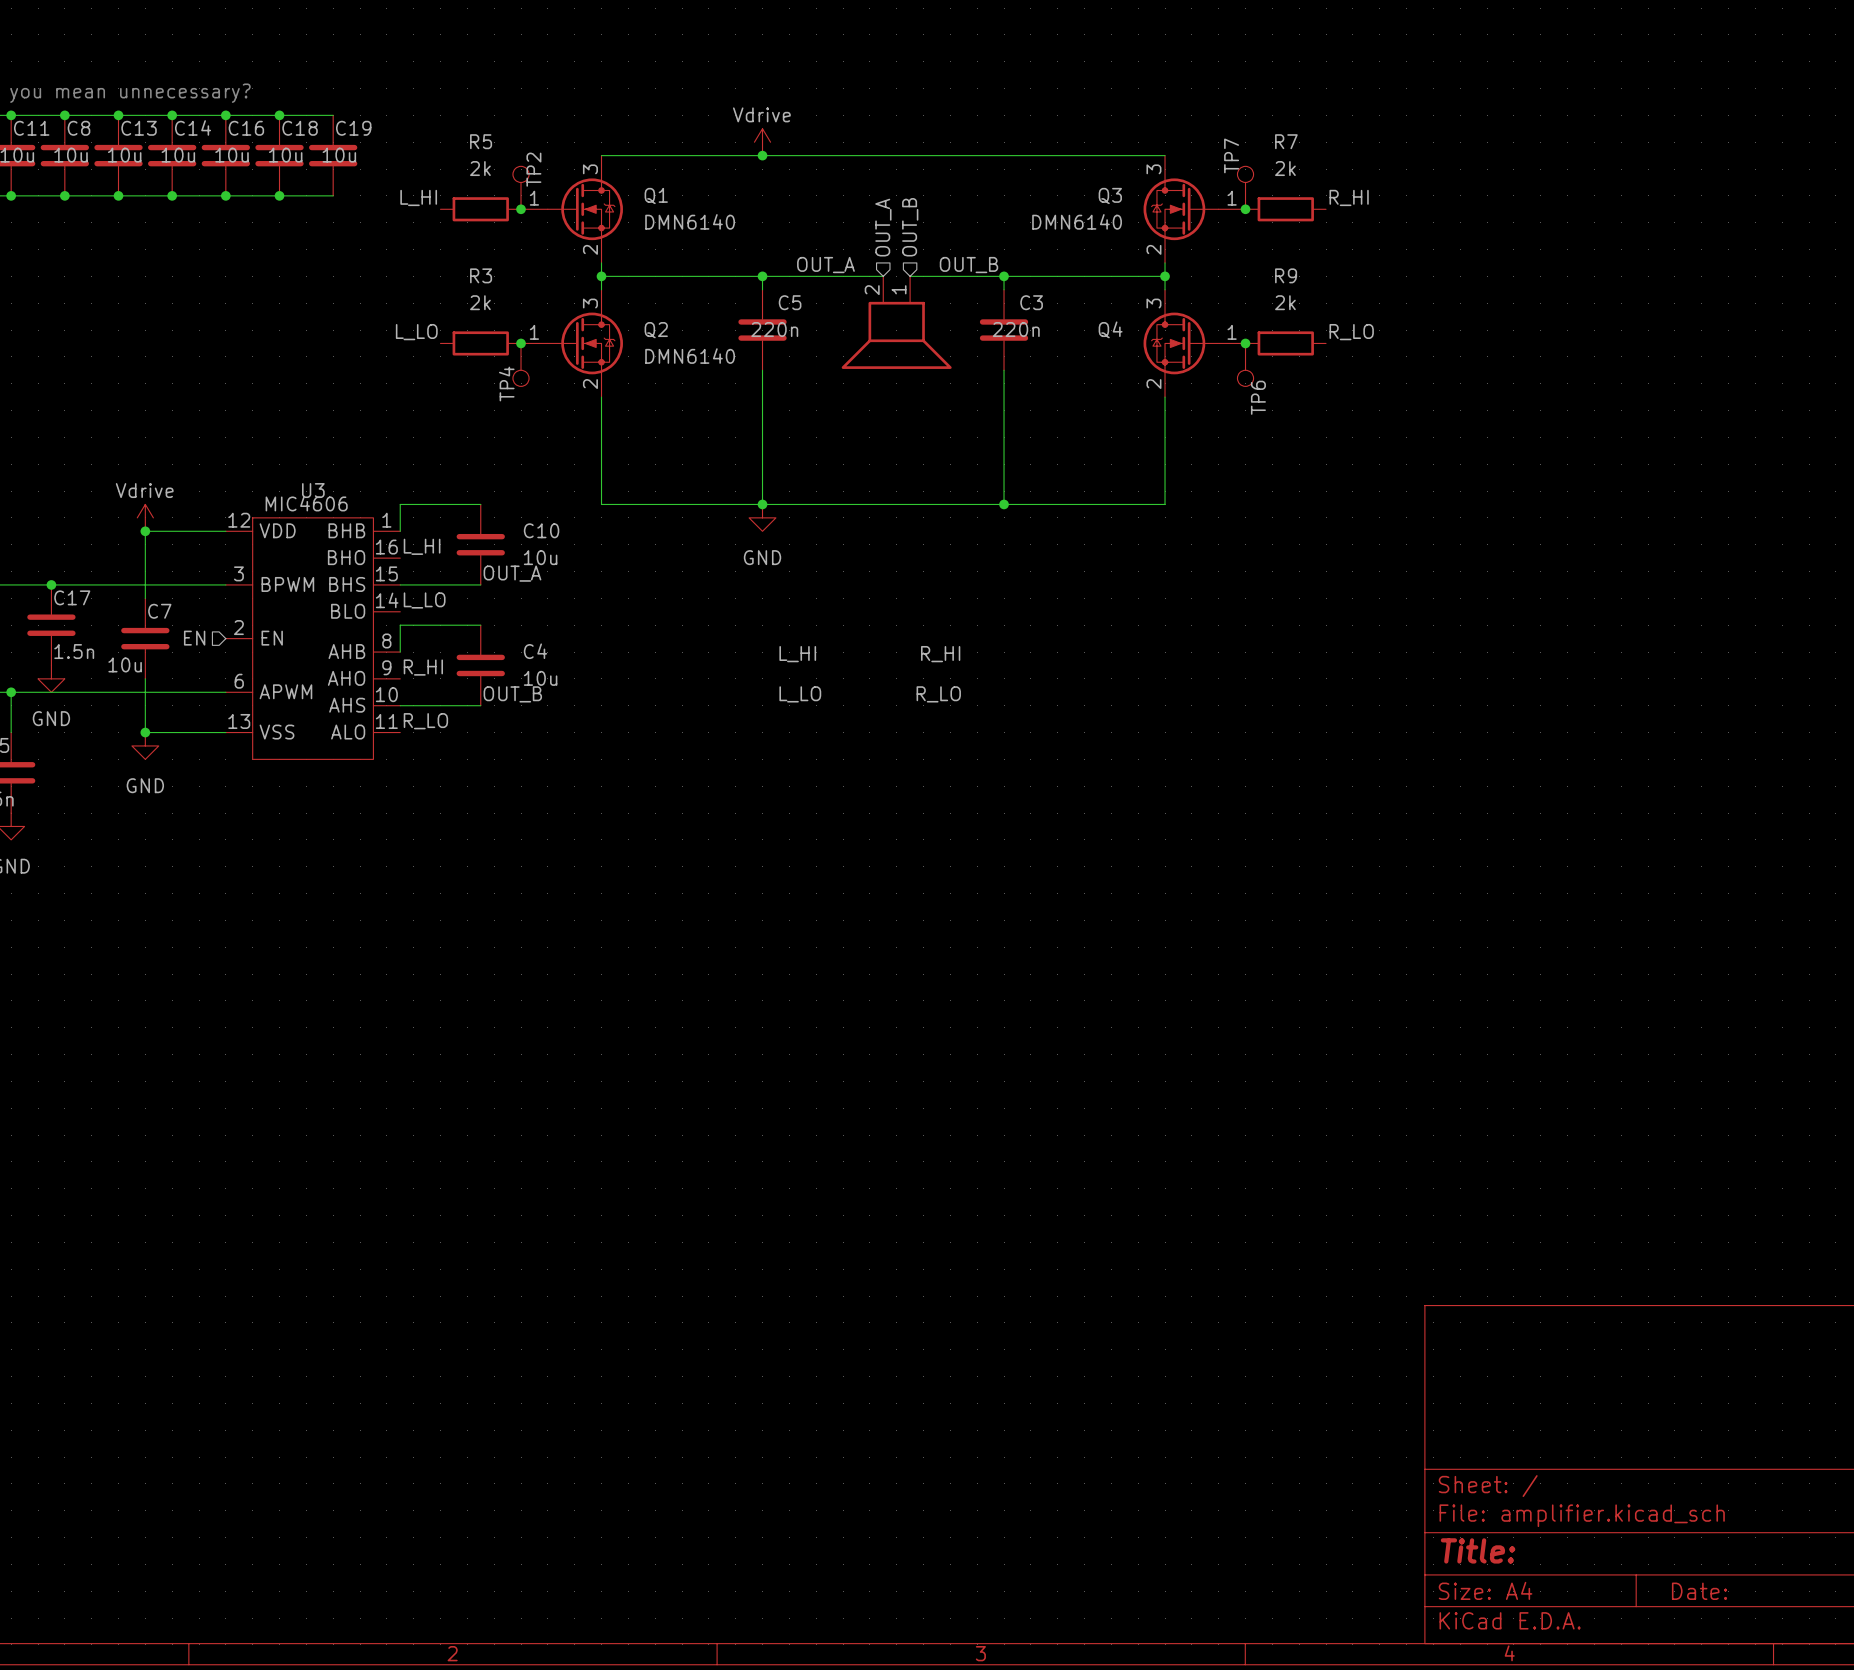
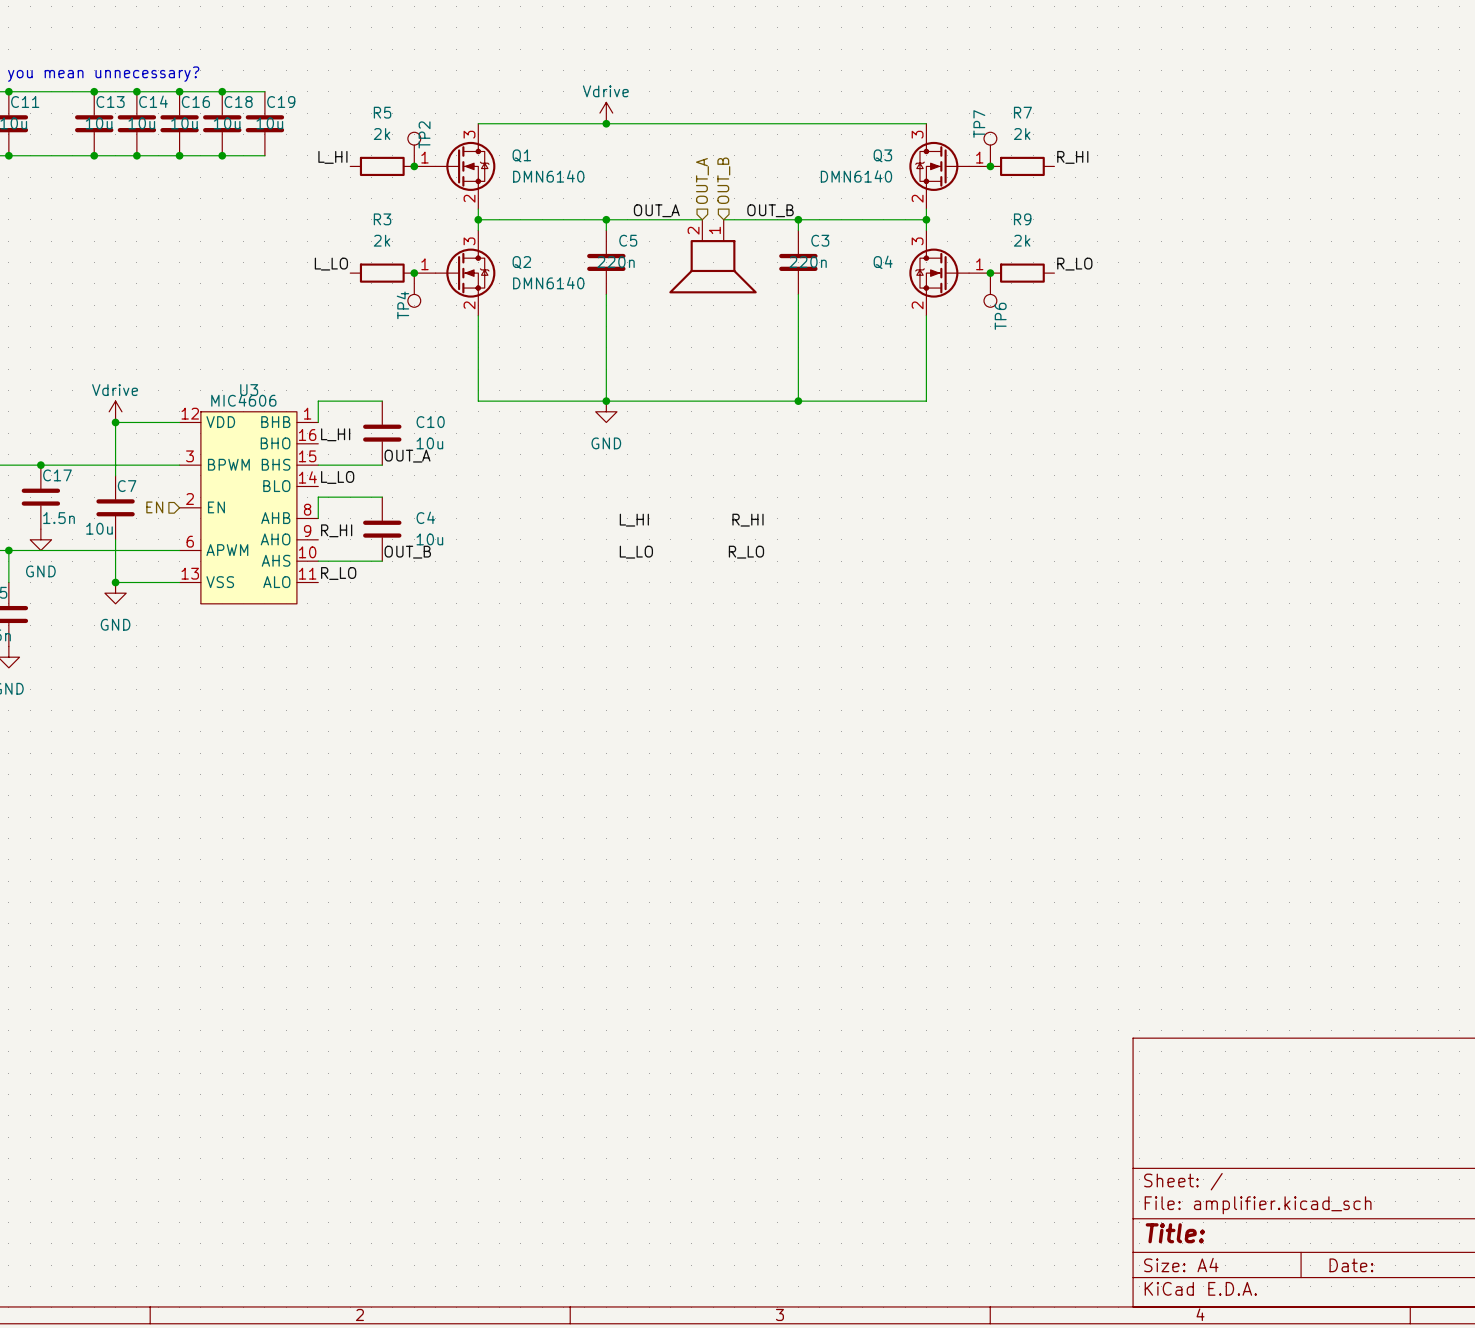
junction: (64, 115) -> none
C8: 10u (64, 155) -> none
junction: (64, 195) -> none

